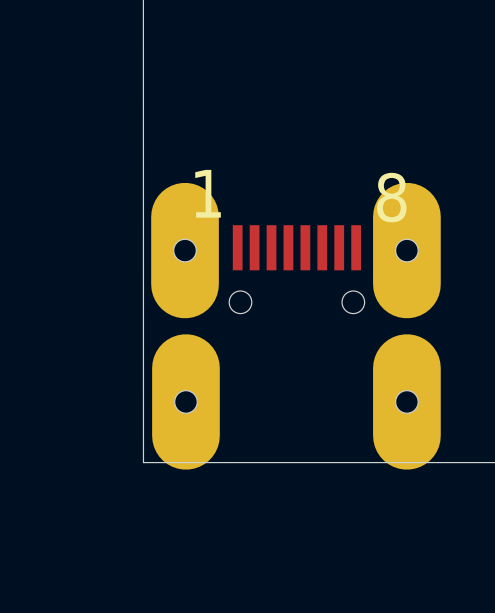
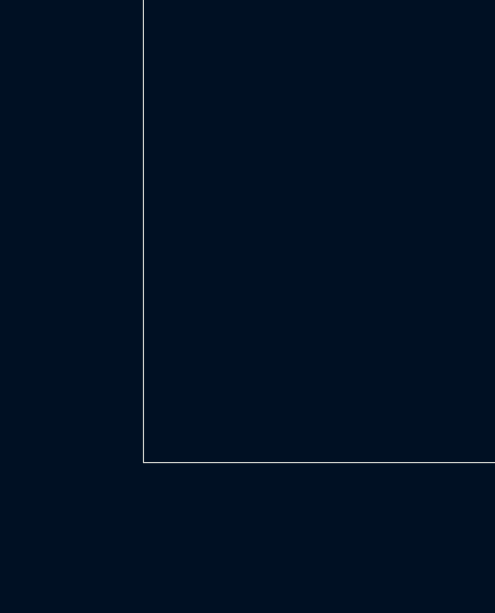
part: (295, 326) -> none

